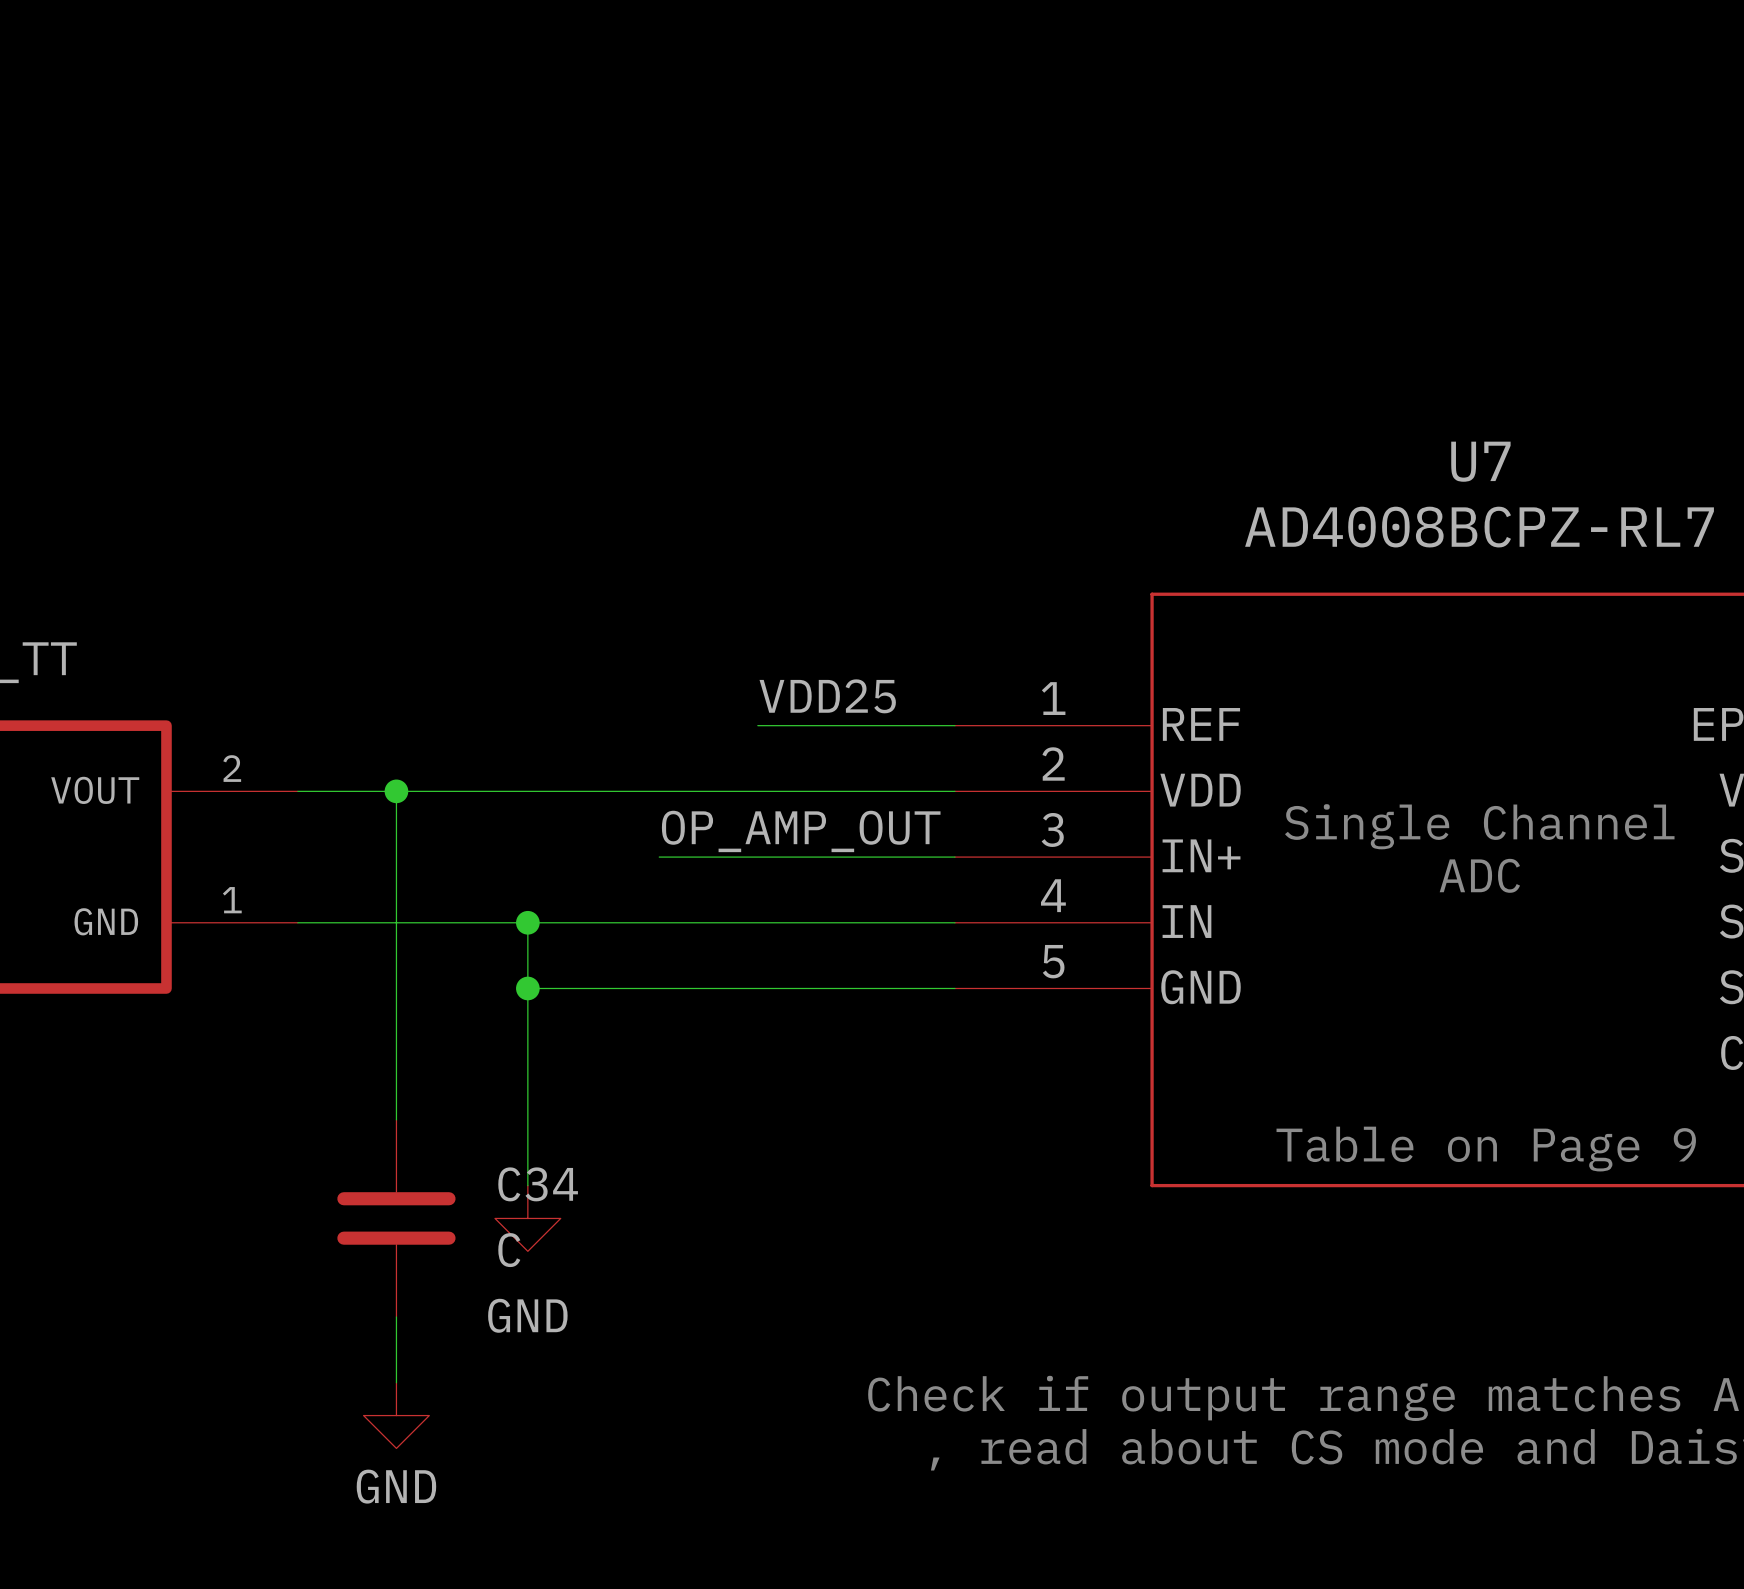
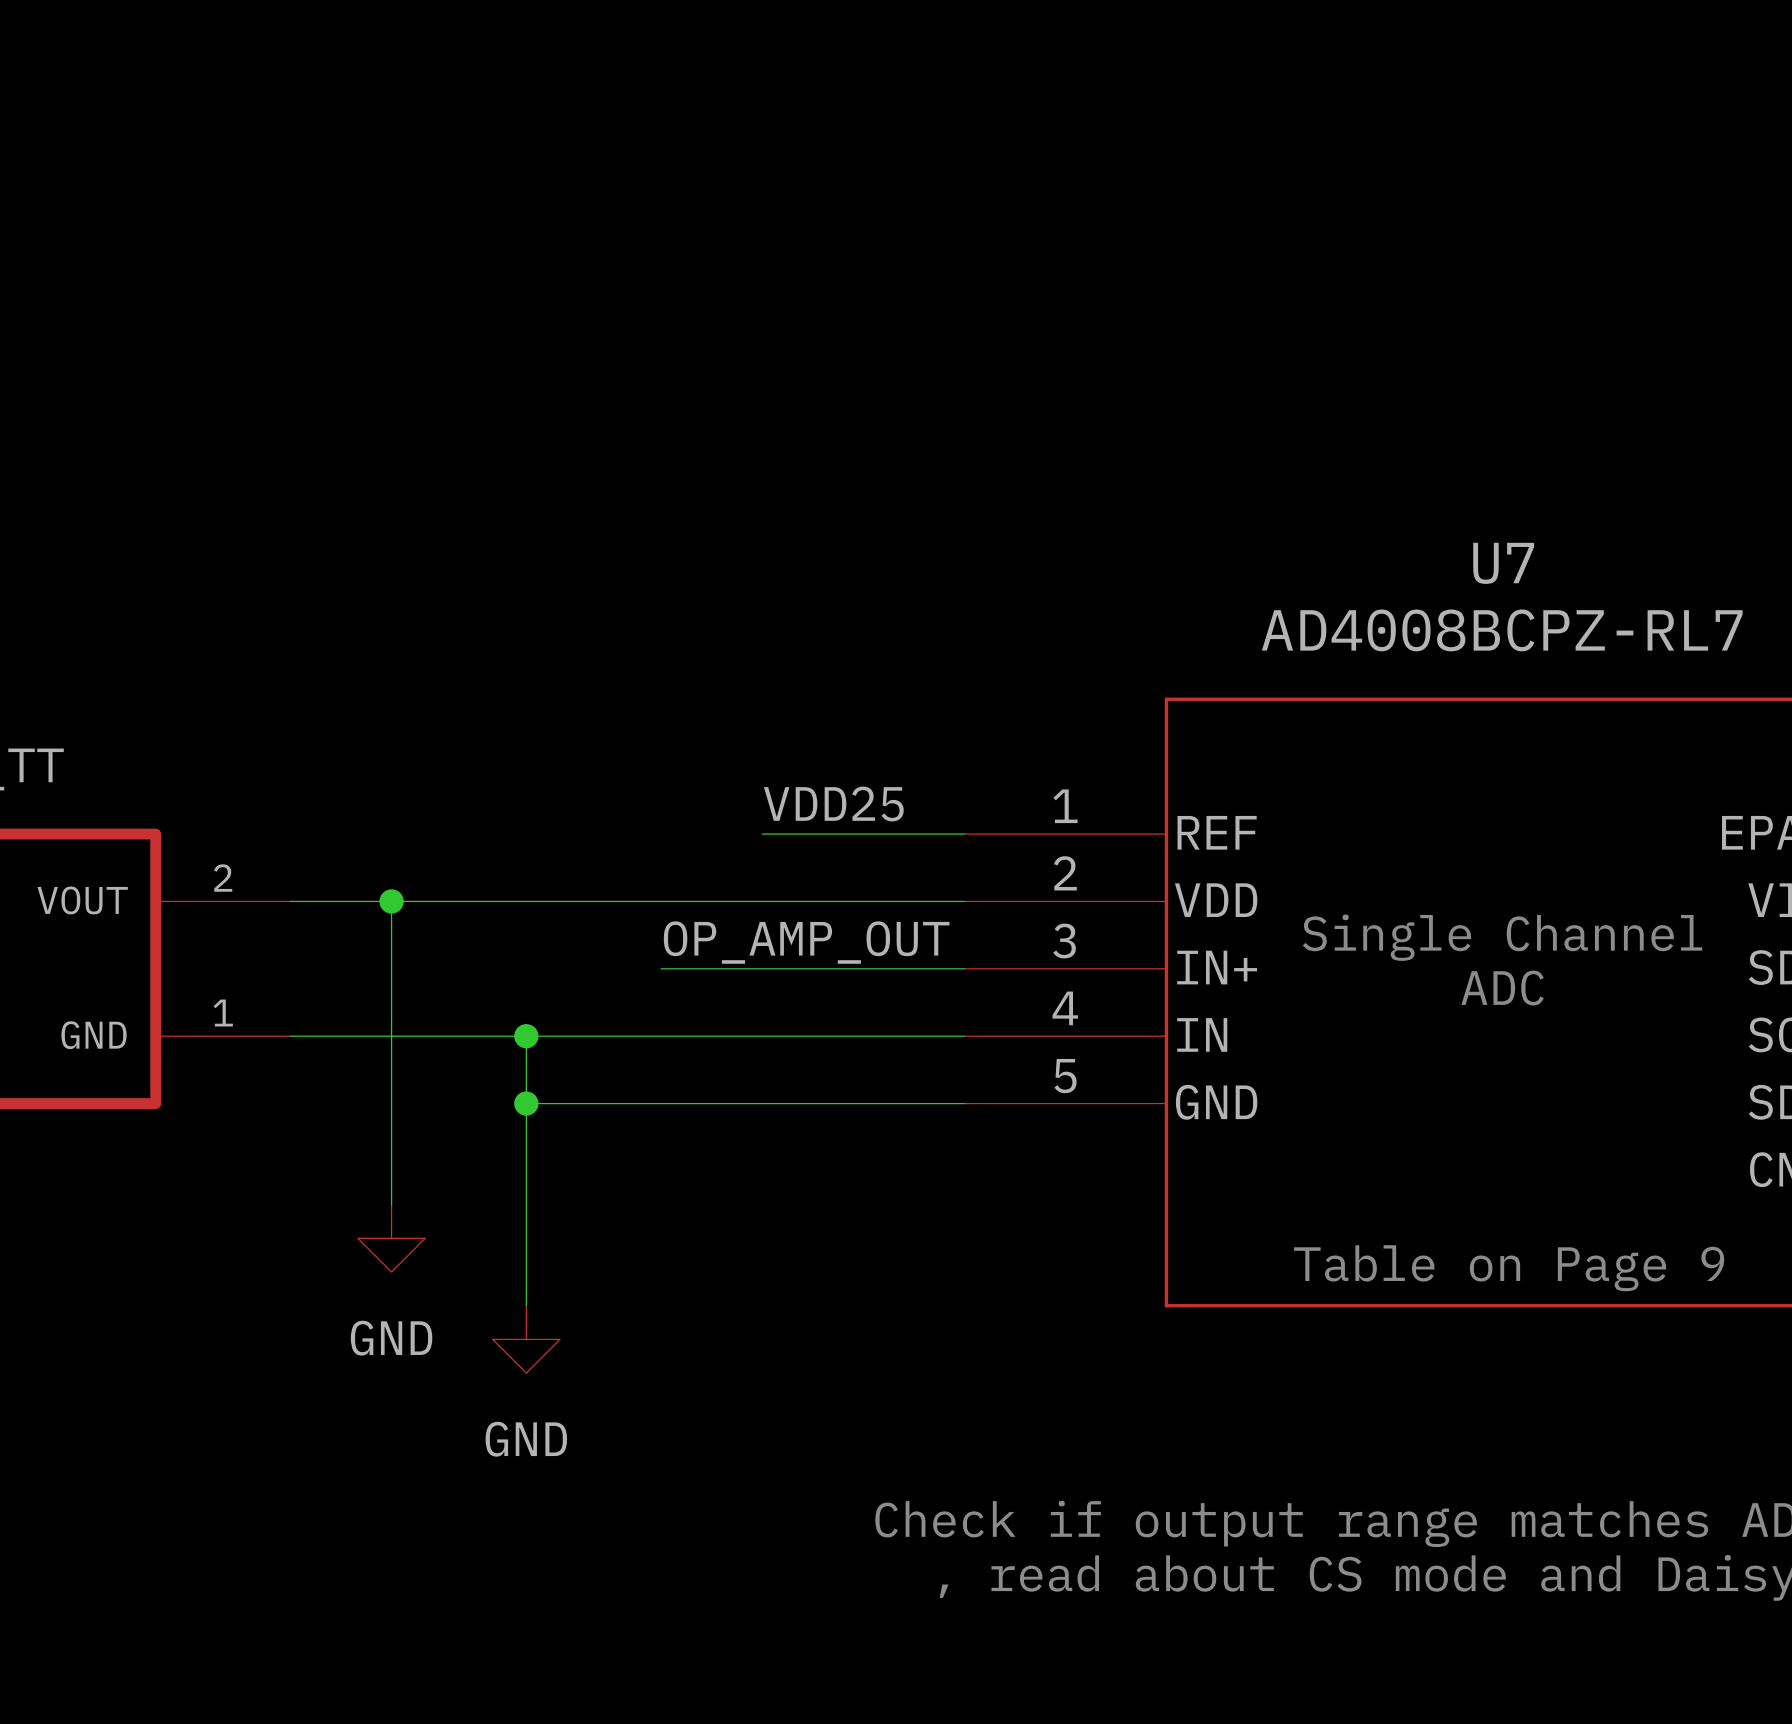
C34: C (396, 1218) -> none
wire: (396, 1317) (396, 1382) -> none
power symbol position: GND (396, 1415) -> GND (391, 1238)
power symbol text position: GND (396, 1486) -> GND (391, 1338)

